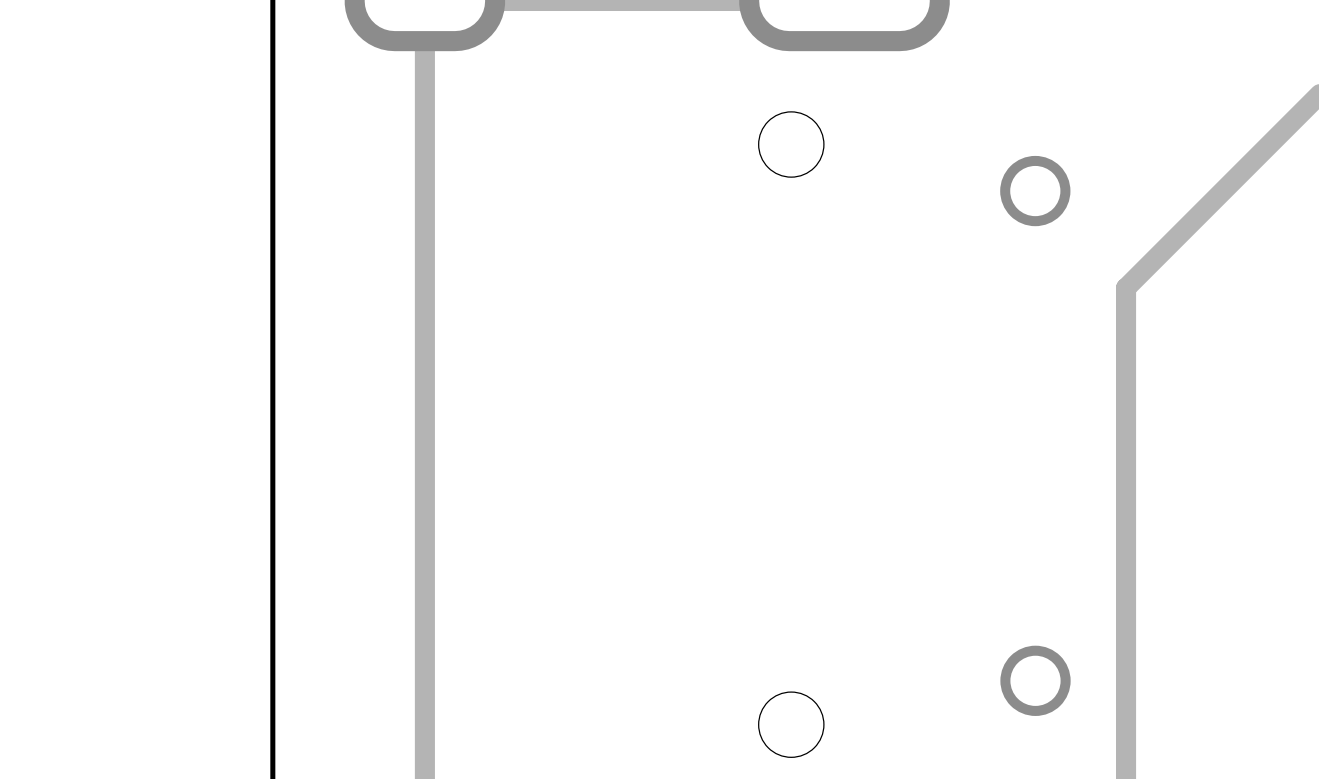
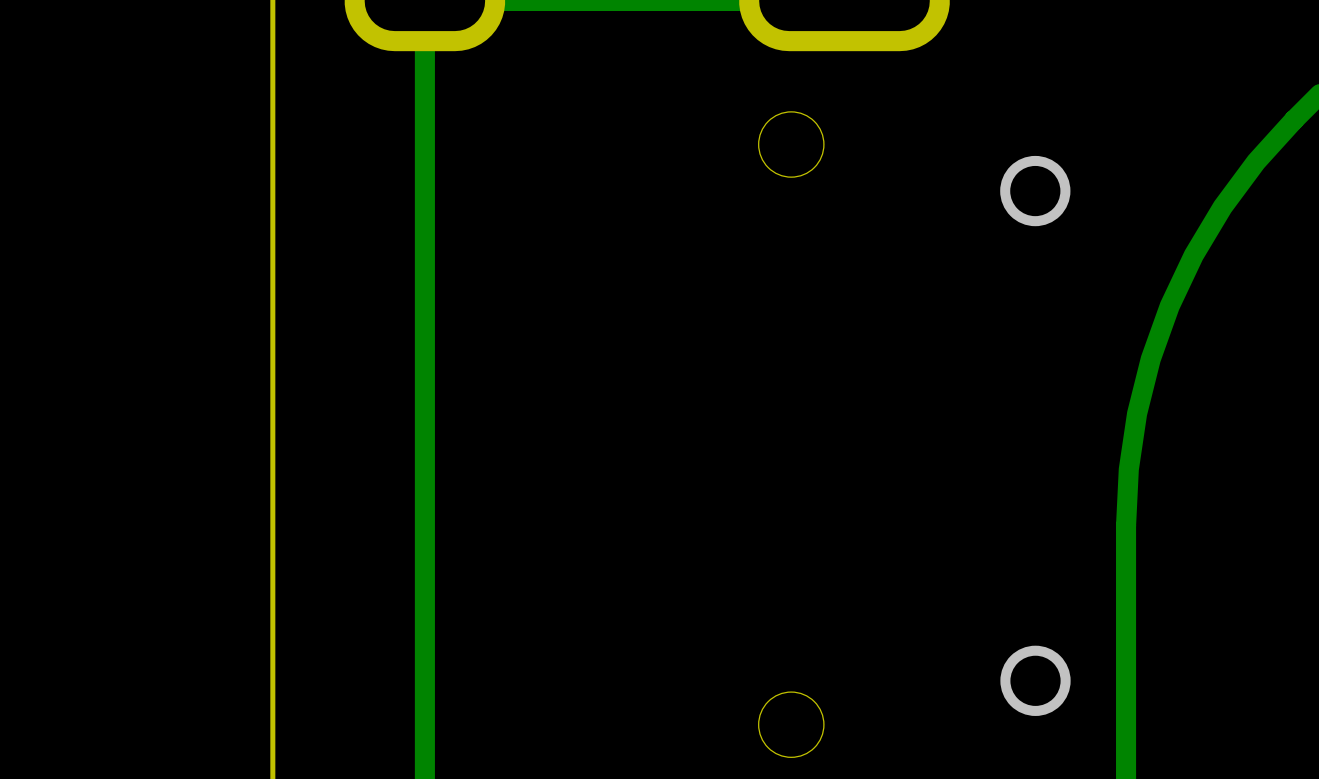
track: (1294, 120) (1126, 288) (1126, 525) -> (1294, 120) (1256, 161) (1222, 206) (1193, 255) (1169, 306) (1150, 359) (1137, 413) (1128, 469) (1126, 525)

